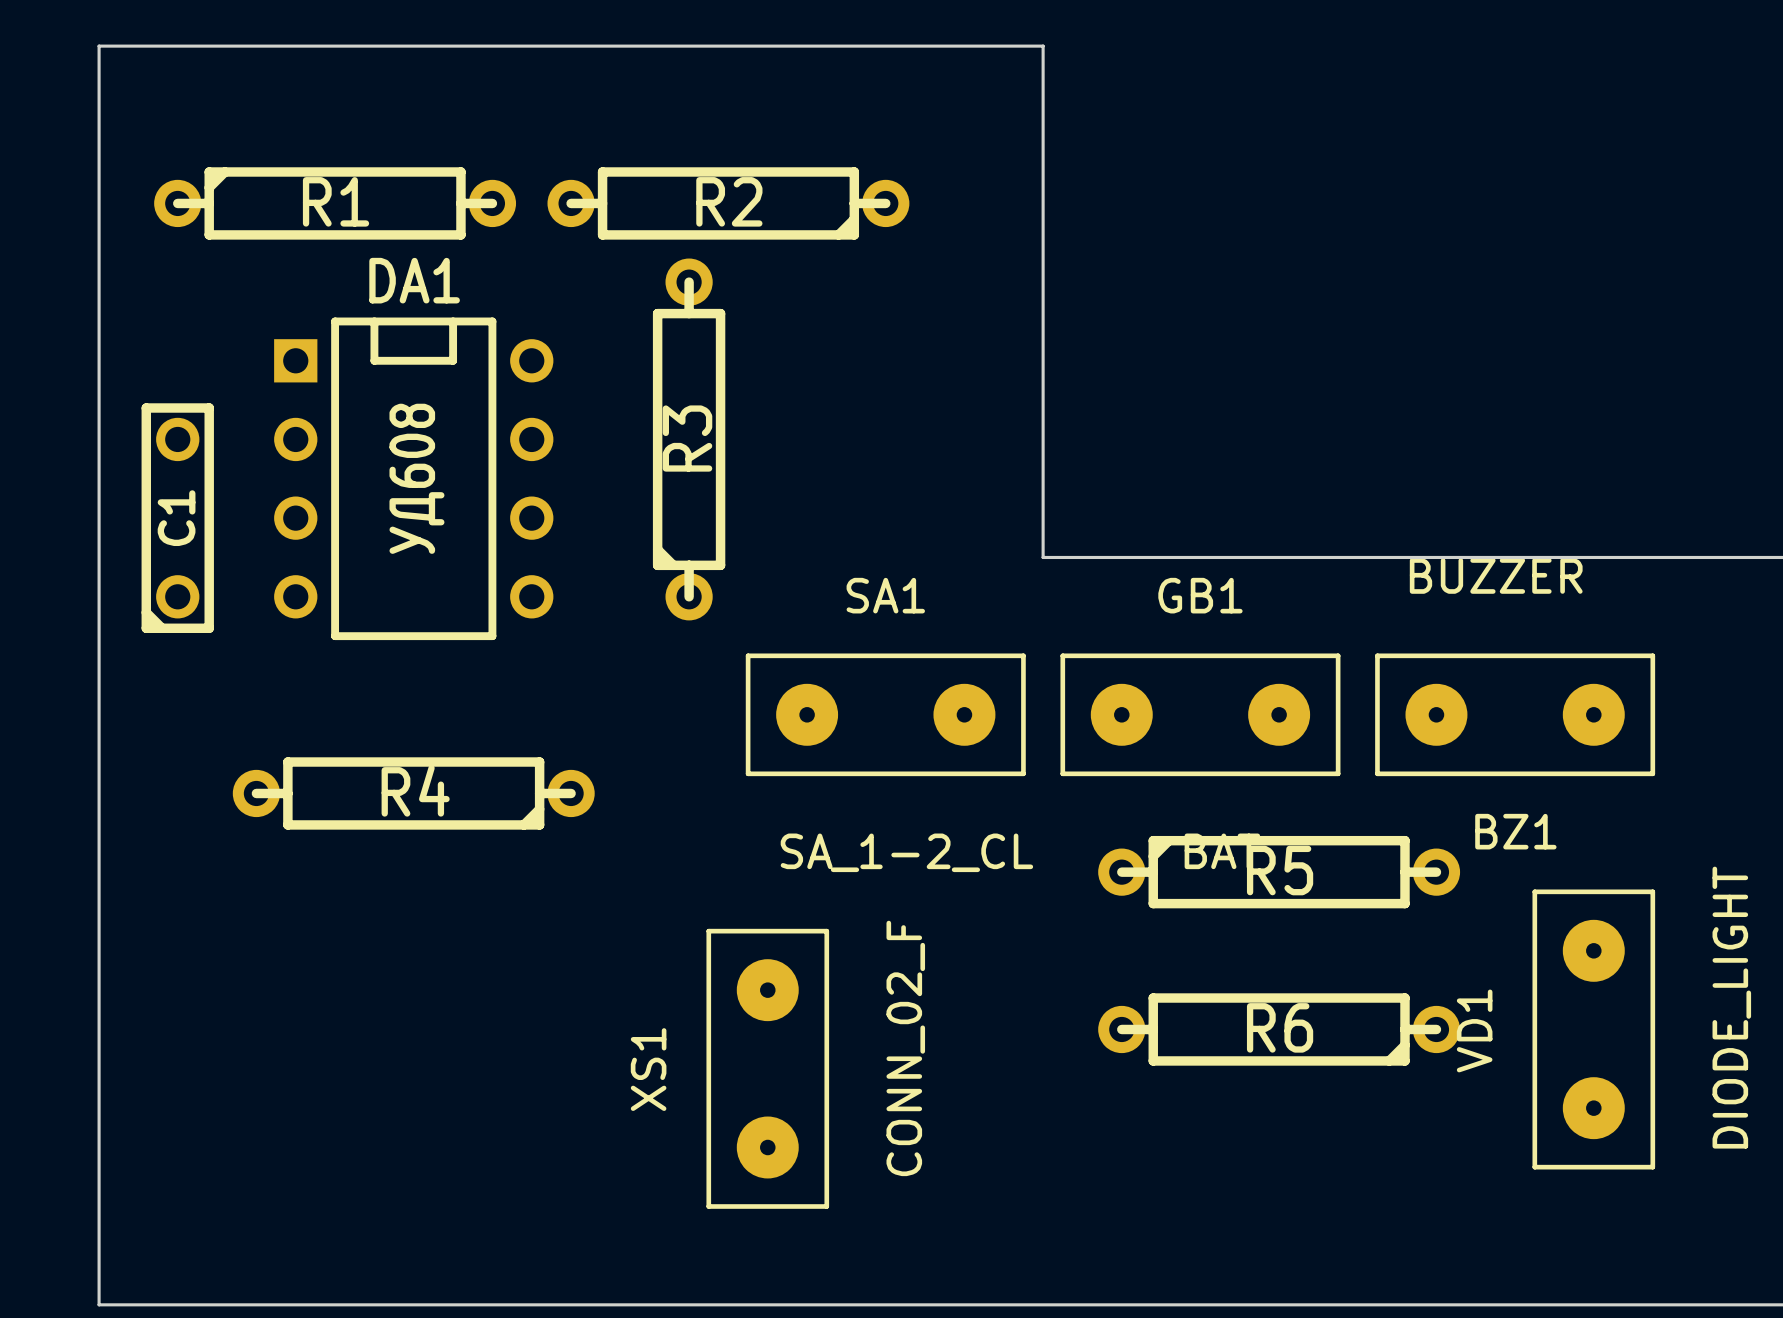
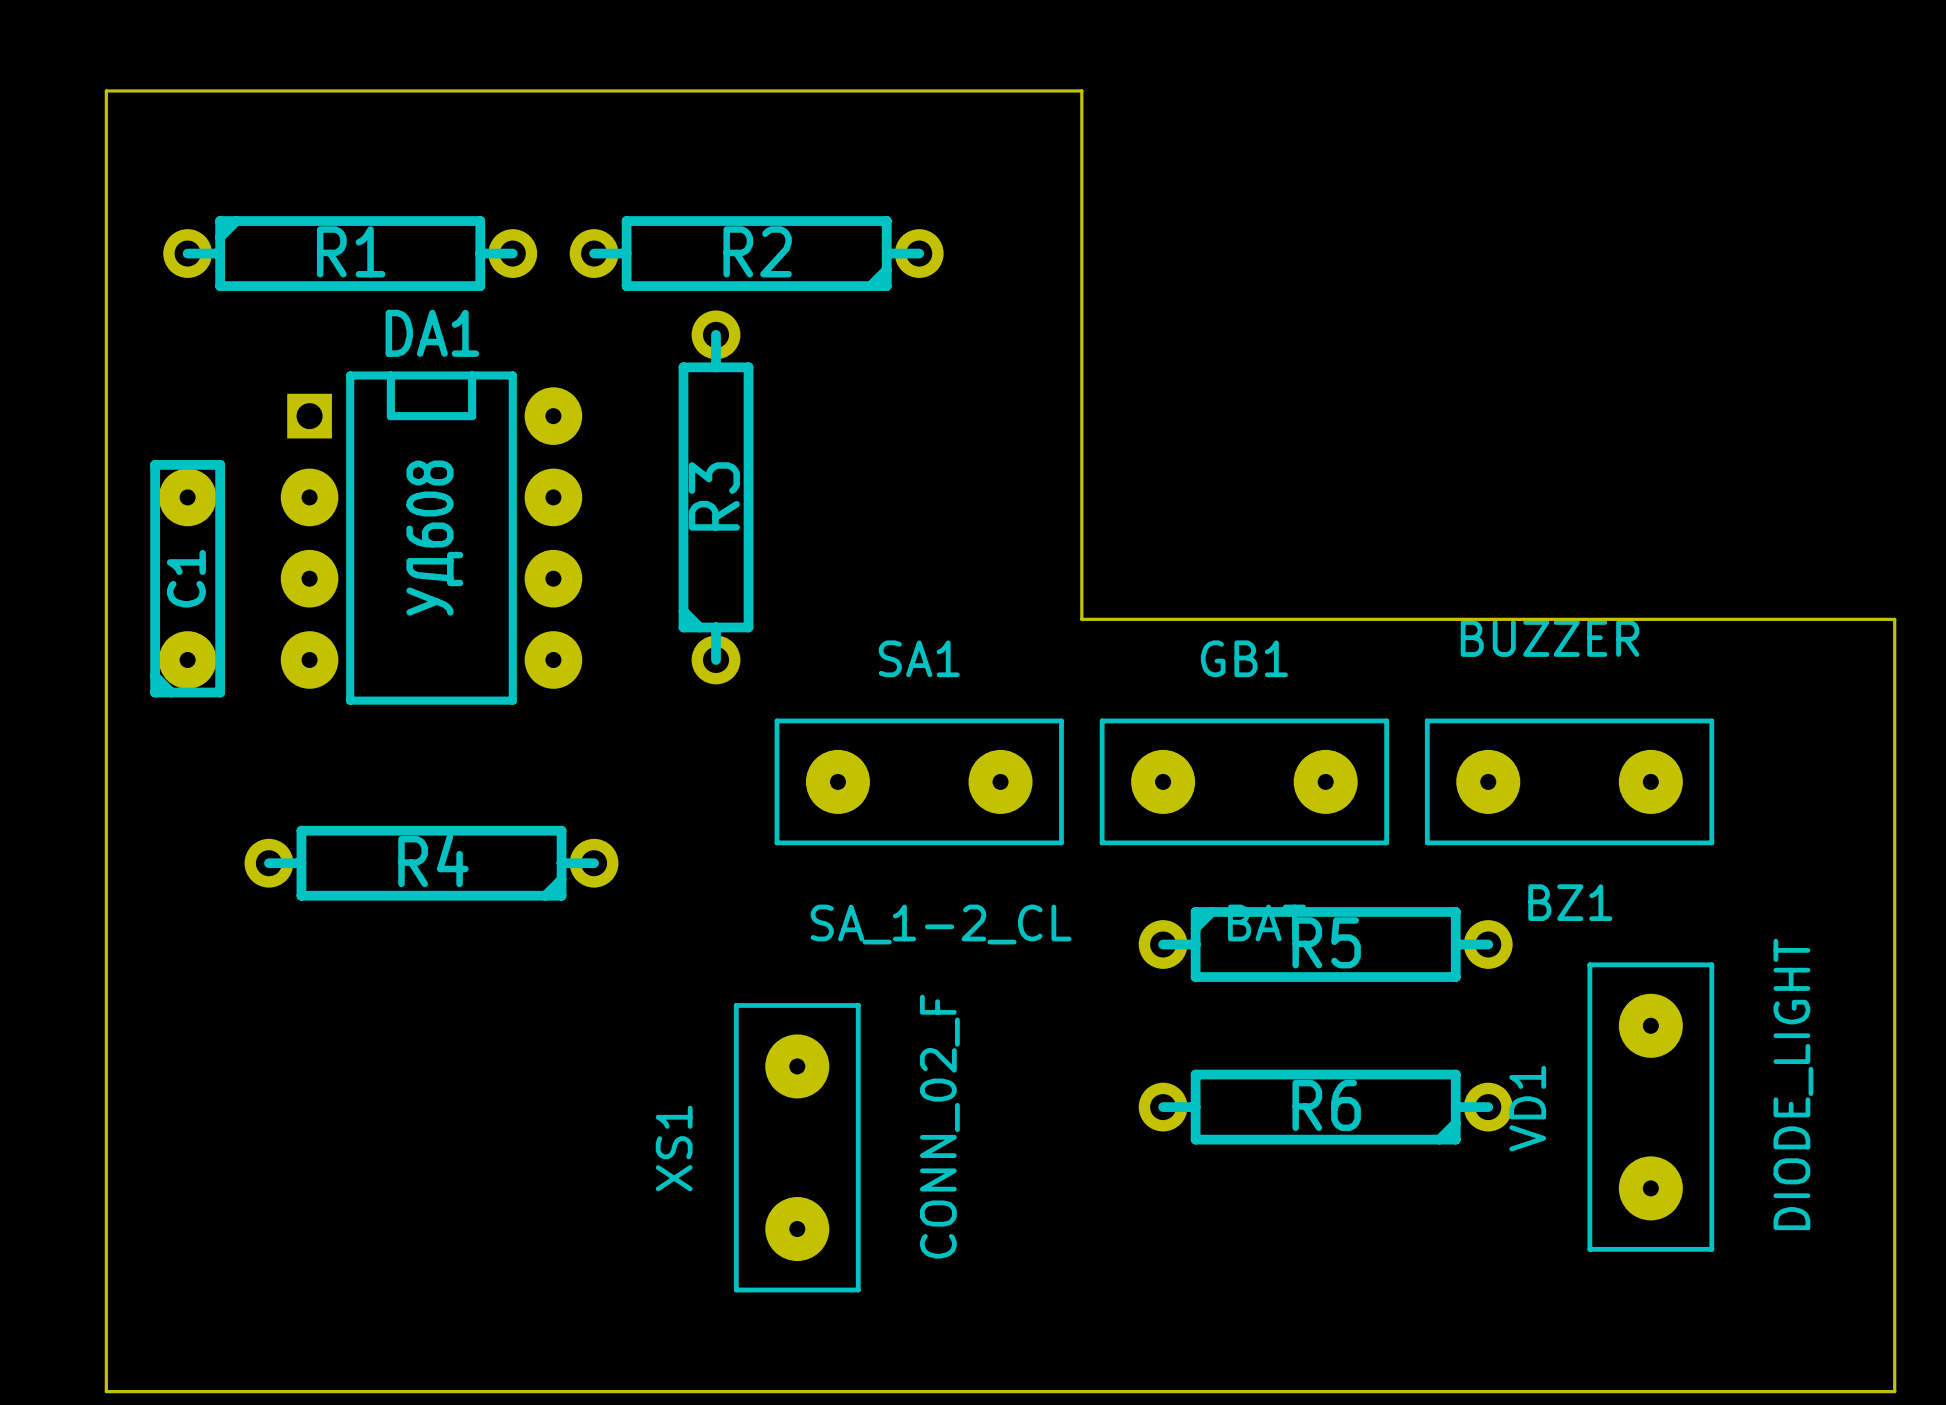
DA1 footprint: [274, 317, 554, 641] -> [280, 371, 583, 705]
C1 footprint: [141, 403, 214, 633] -> [150, 460, 226, 698]

